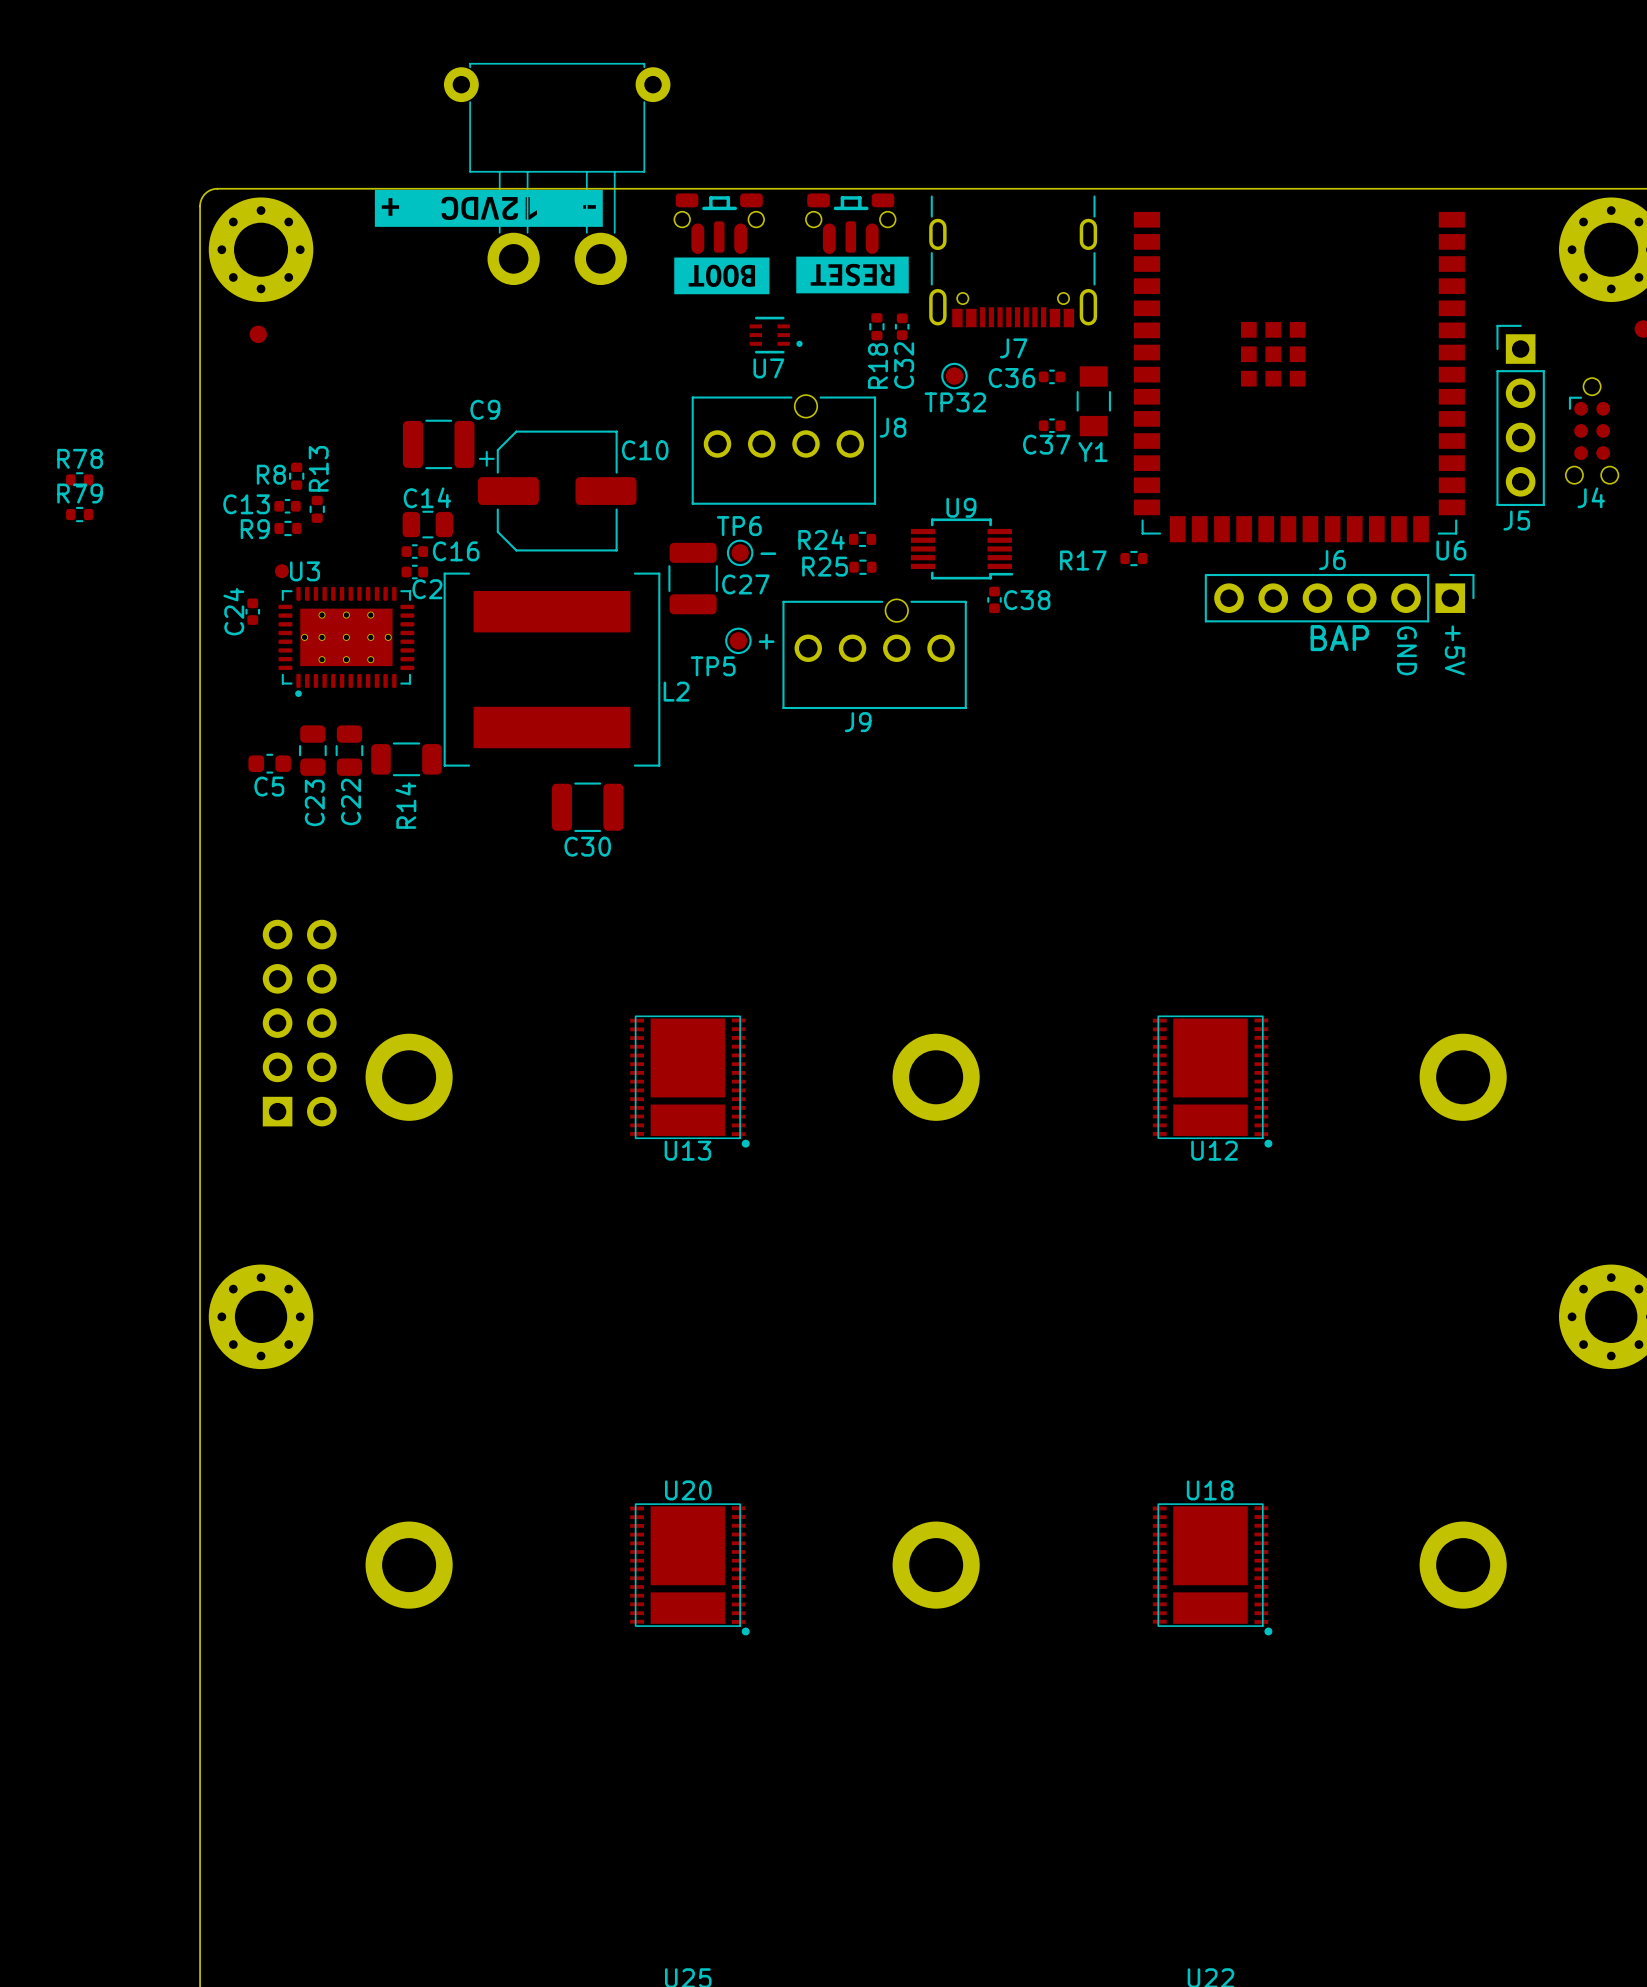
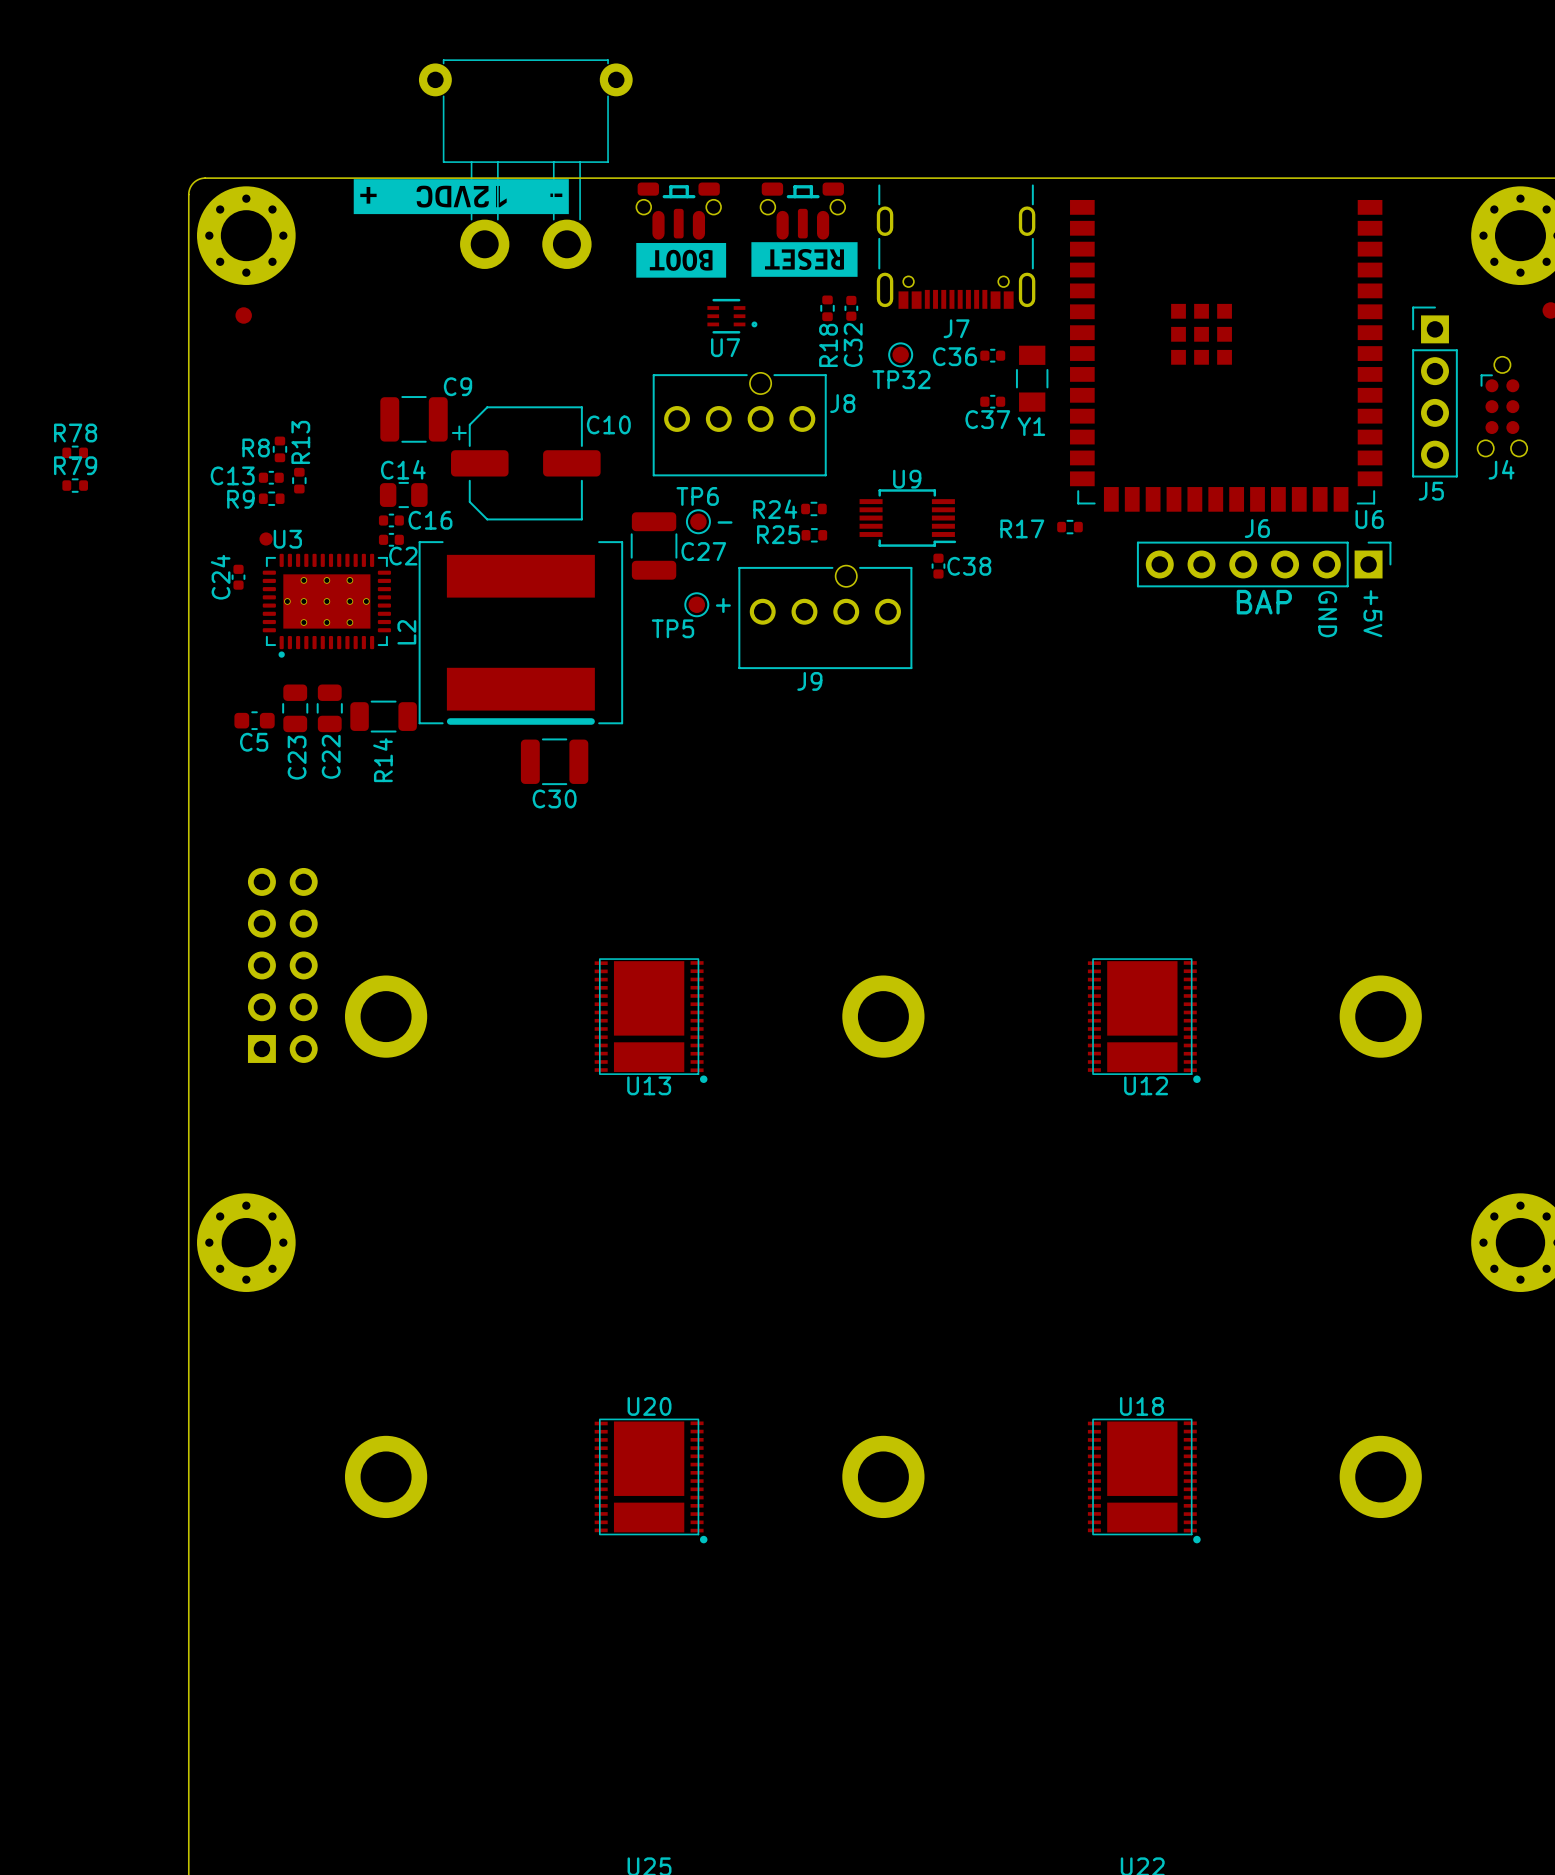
L2 footprint: [443, 572, 661, 767] -> [418, 541, 624, 725]
L2 name position: L2 (676, 691) -> L2 (406, 632)

